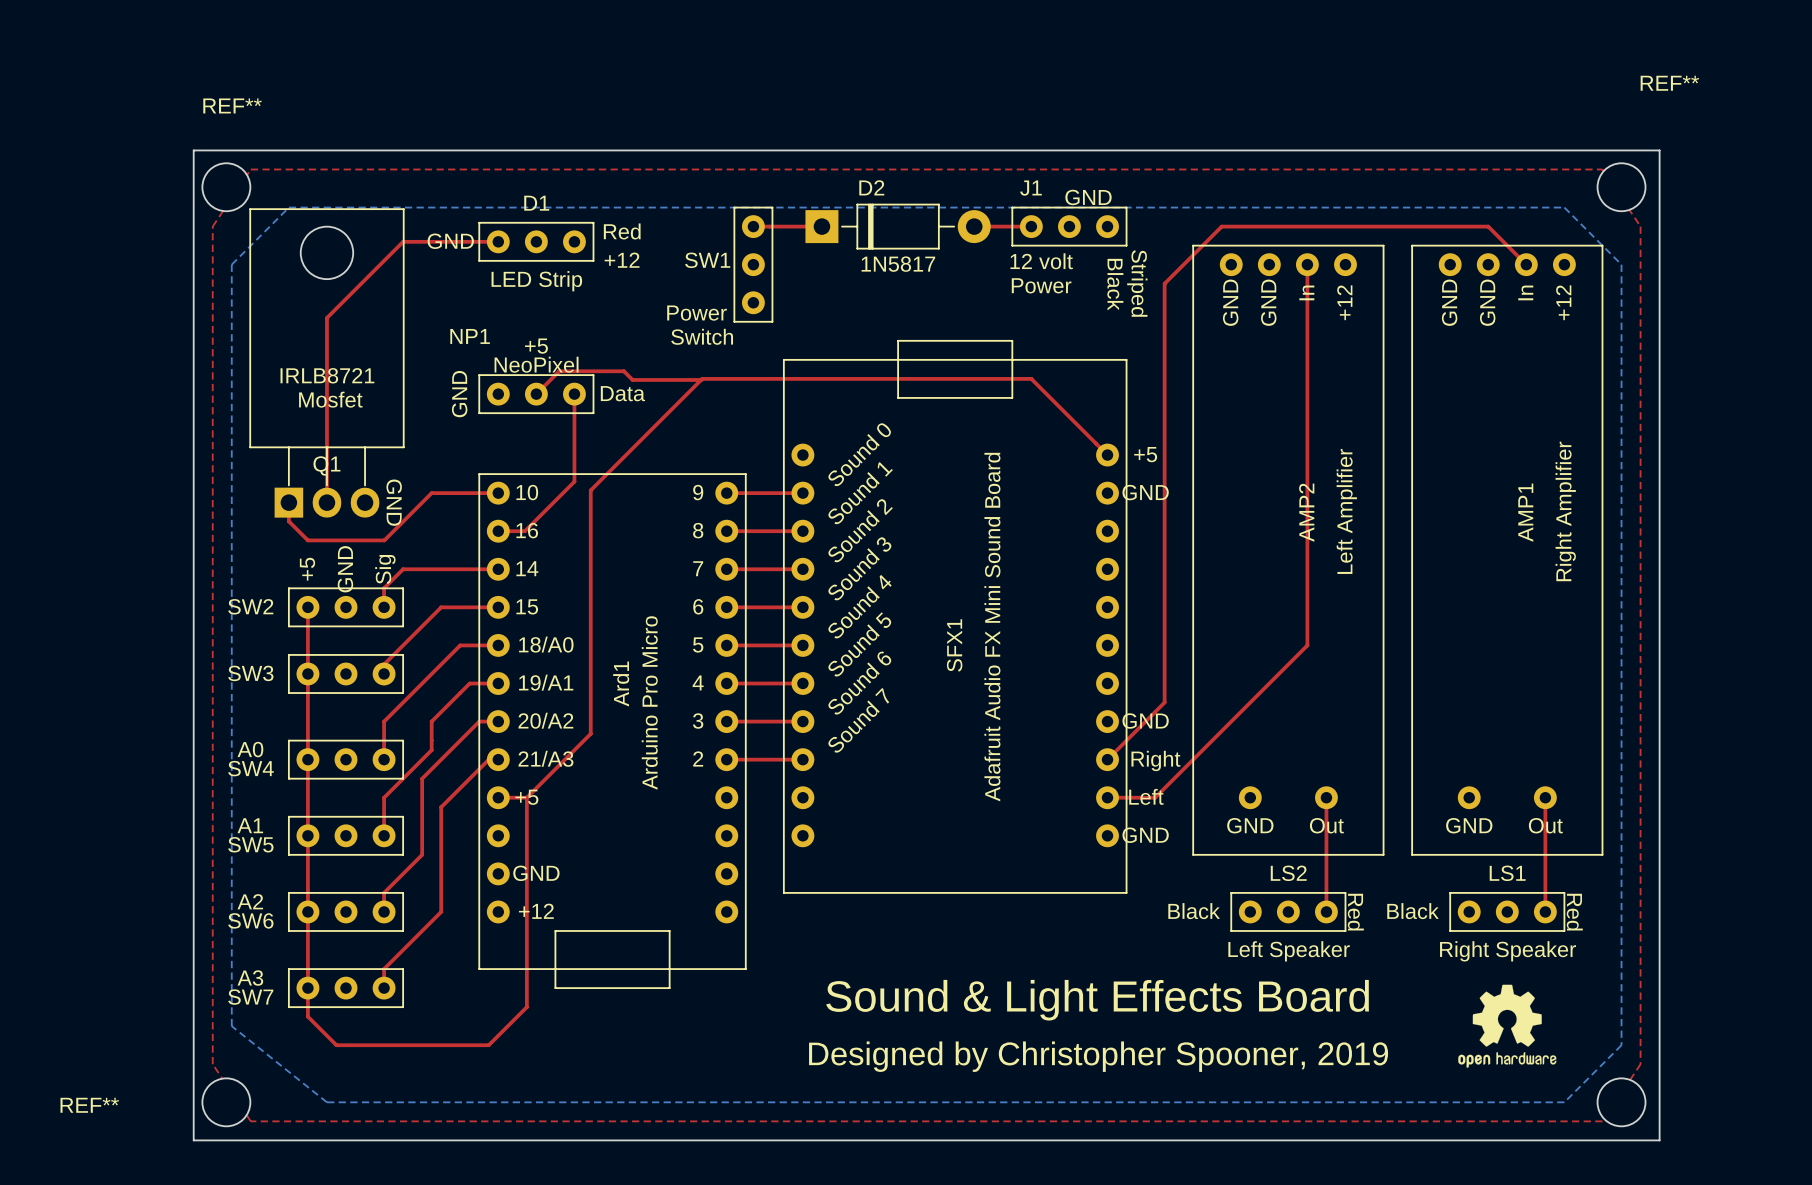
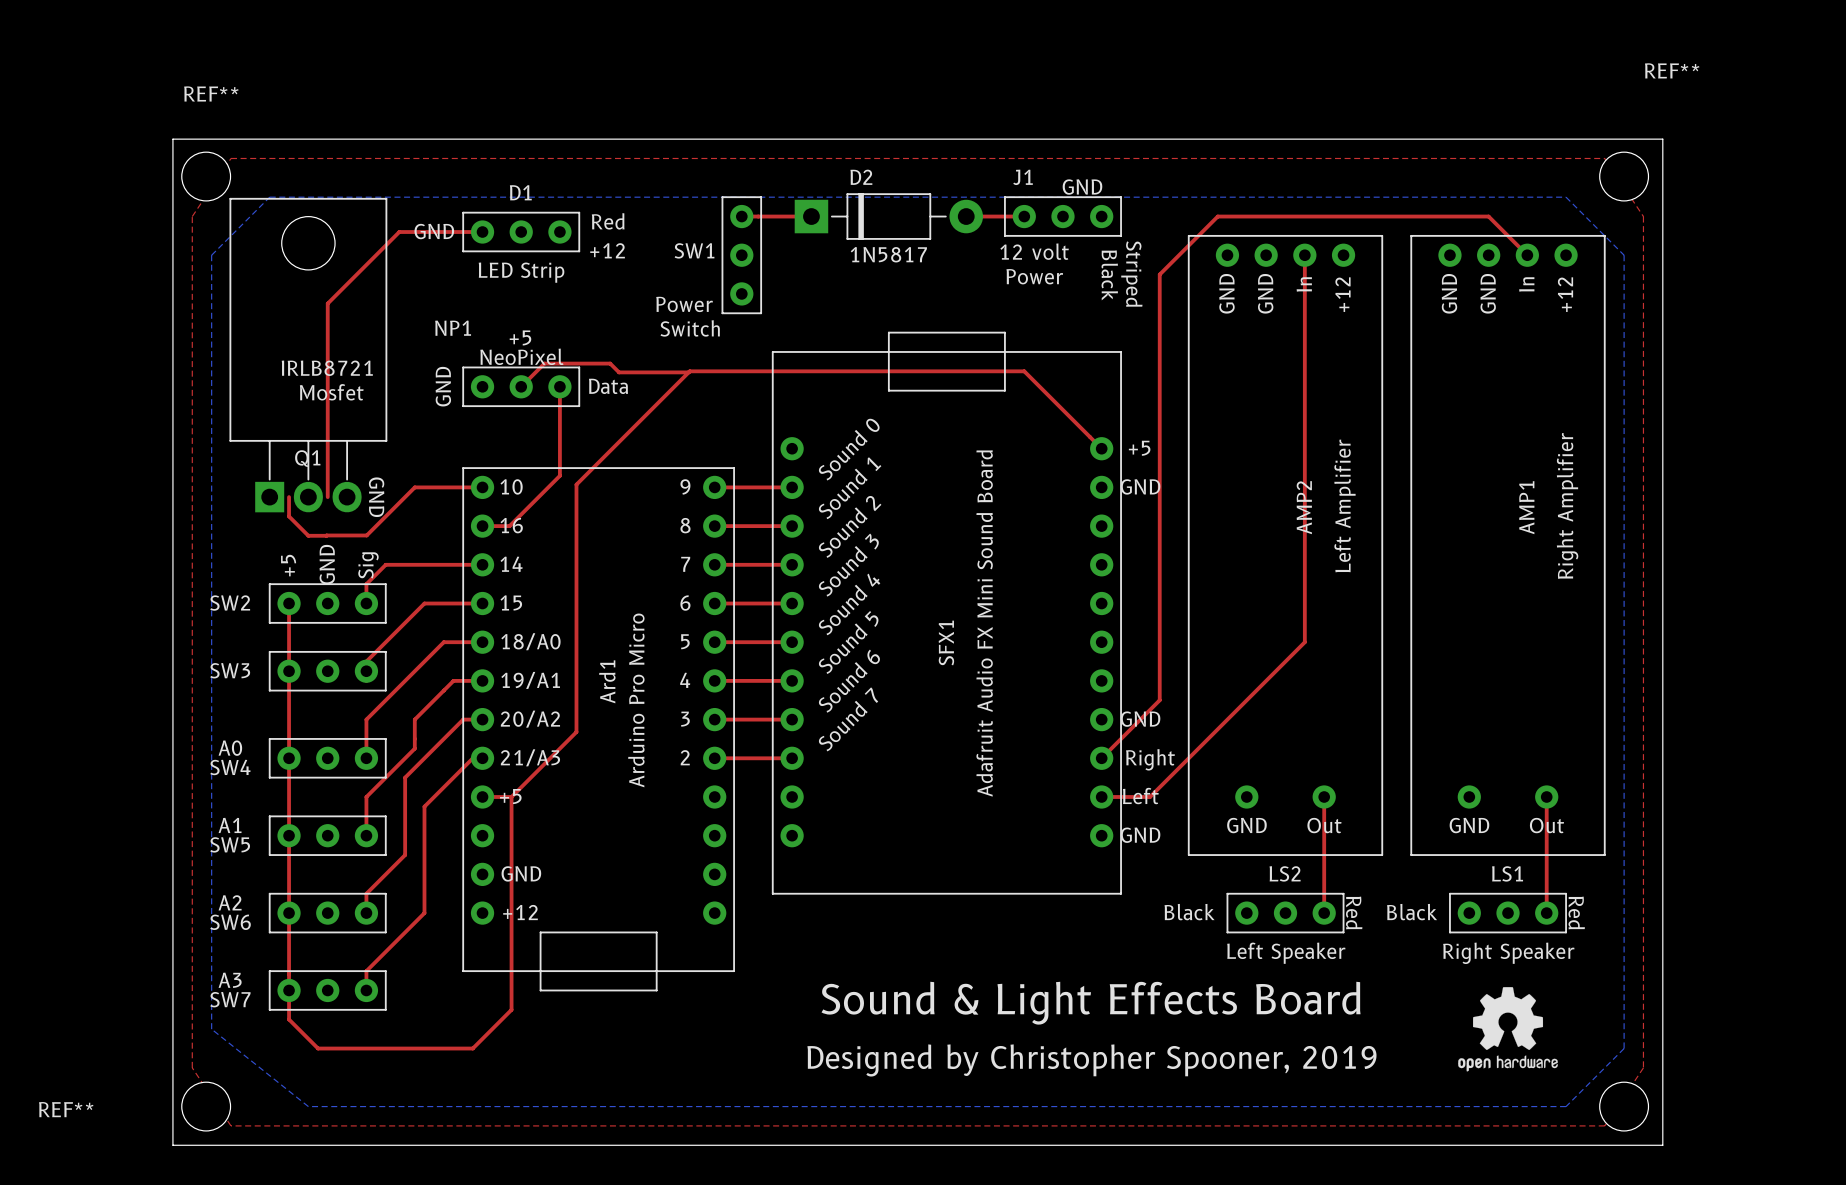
top track: (416, 241) (403, 241) (326, 317) (326, 512) -> (399, 232) (327, 303) (327, 497)
text position: IRLB8721 (327, 375) -> IRLB8721 (327, 368)
text position: Mosfet (330, 399) -> Mosfet (331, 392)
top track: (288, 502) (288, 521) (307, 540) (344, 540) -> (289, 497) (289, 516) (308, 535) (326, 535)

